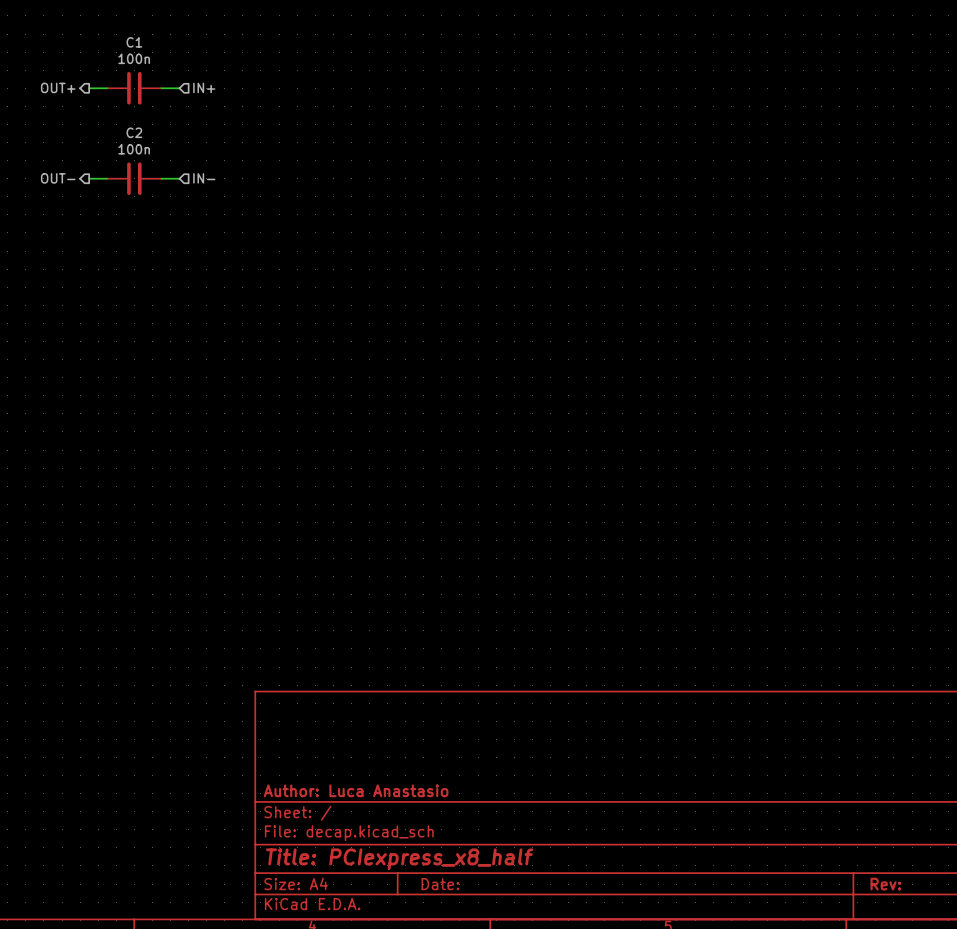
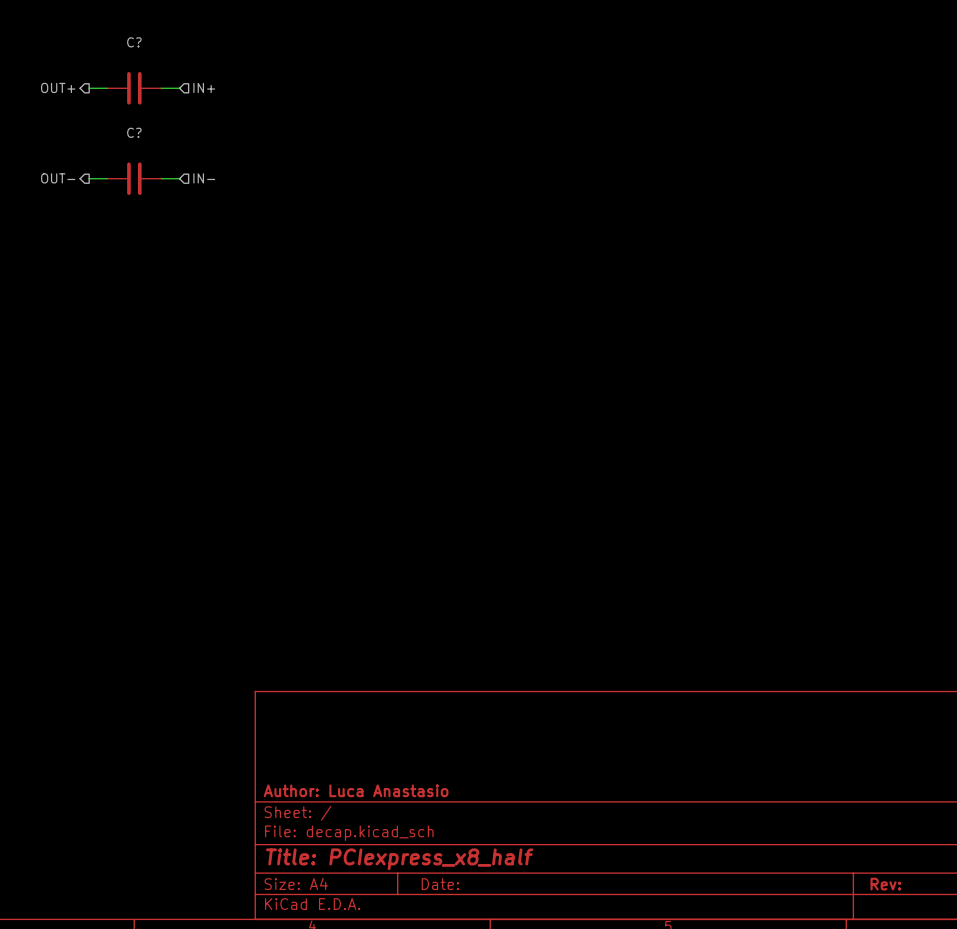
C1 name: C1 (134, 42) -> C? (134, 42)
C1 value: 100n (134, 58) -> none
C2 name: C2 (134, 132) -> C? (134, 132)
C2 value: 100n (134, 149) -> none

